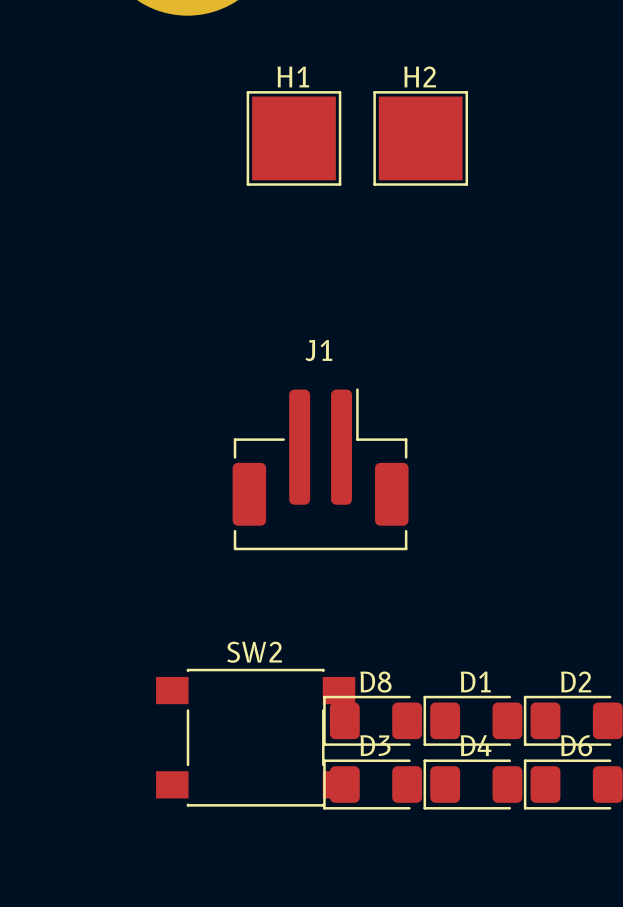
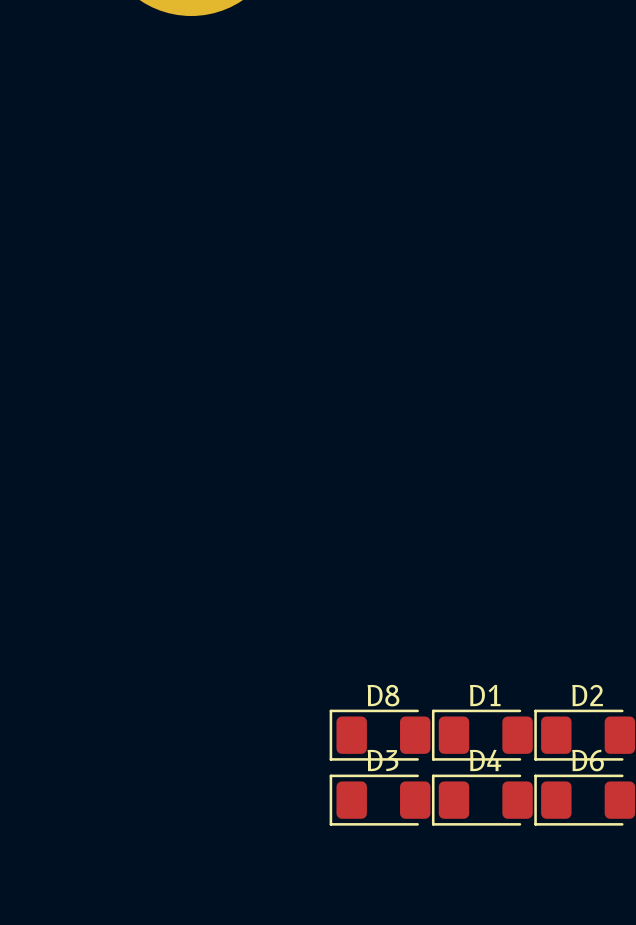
H1: (293, 138) -> none
H2: (420, 138) -> none
J1: (320, 469) -> none
SW2: (255, 737) -> none

